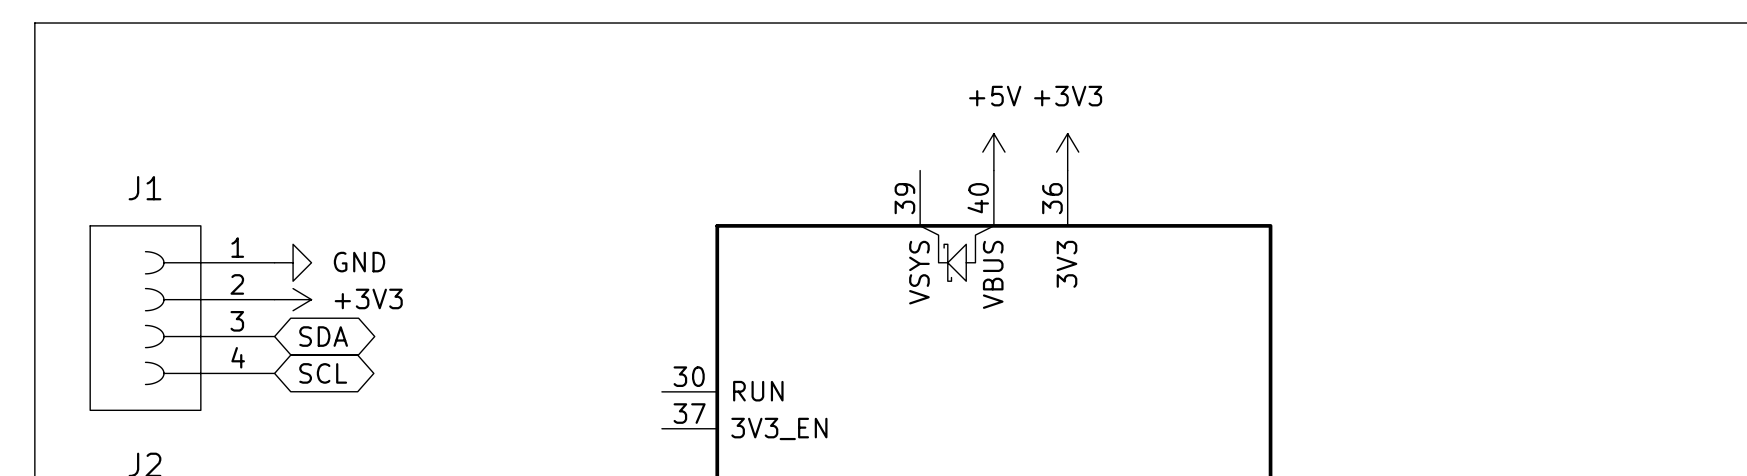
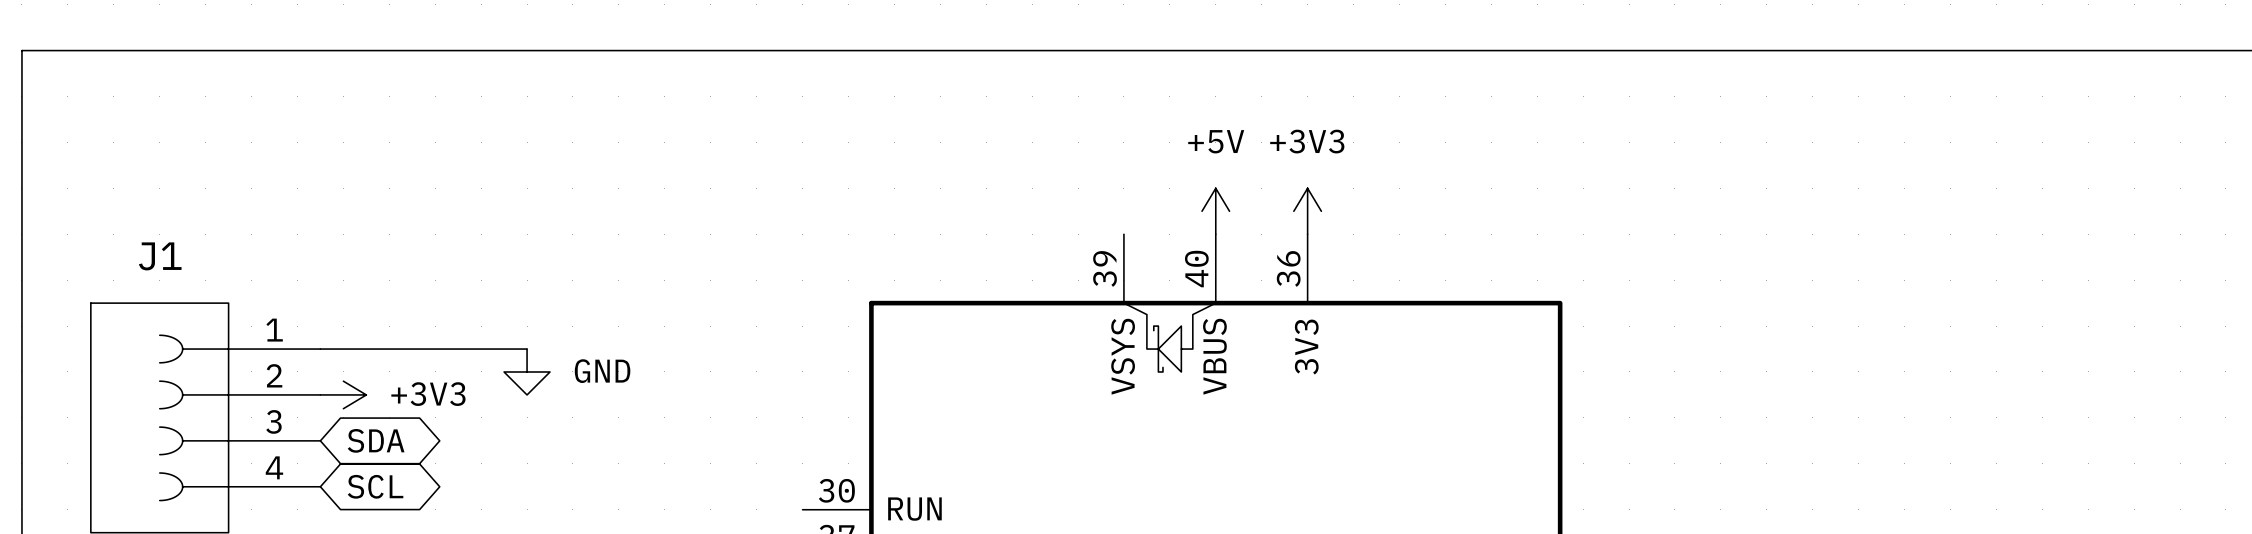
wire: none -> (320, 349) (527, 349)
power symbol rotation: 0° (293, 262) -> 90° clockwise (527, 371)
power symbol position: GND (293, 262) -> GND (527, 371)

